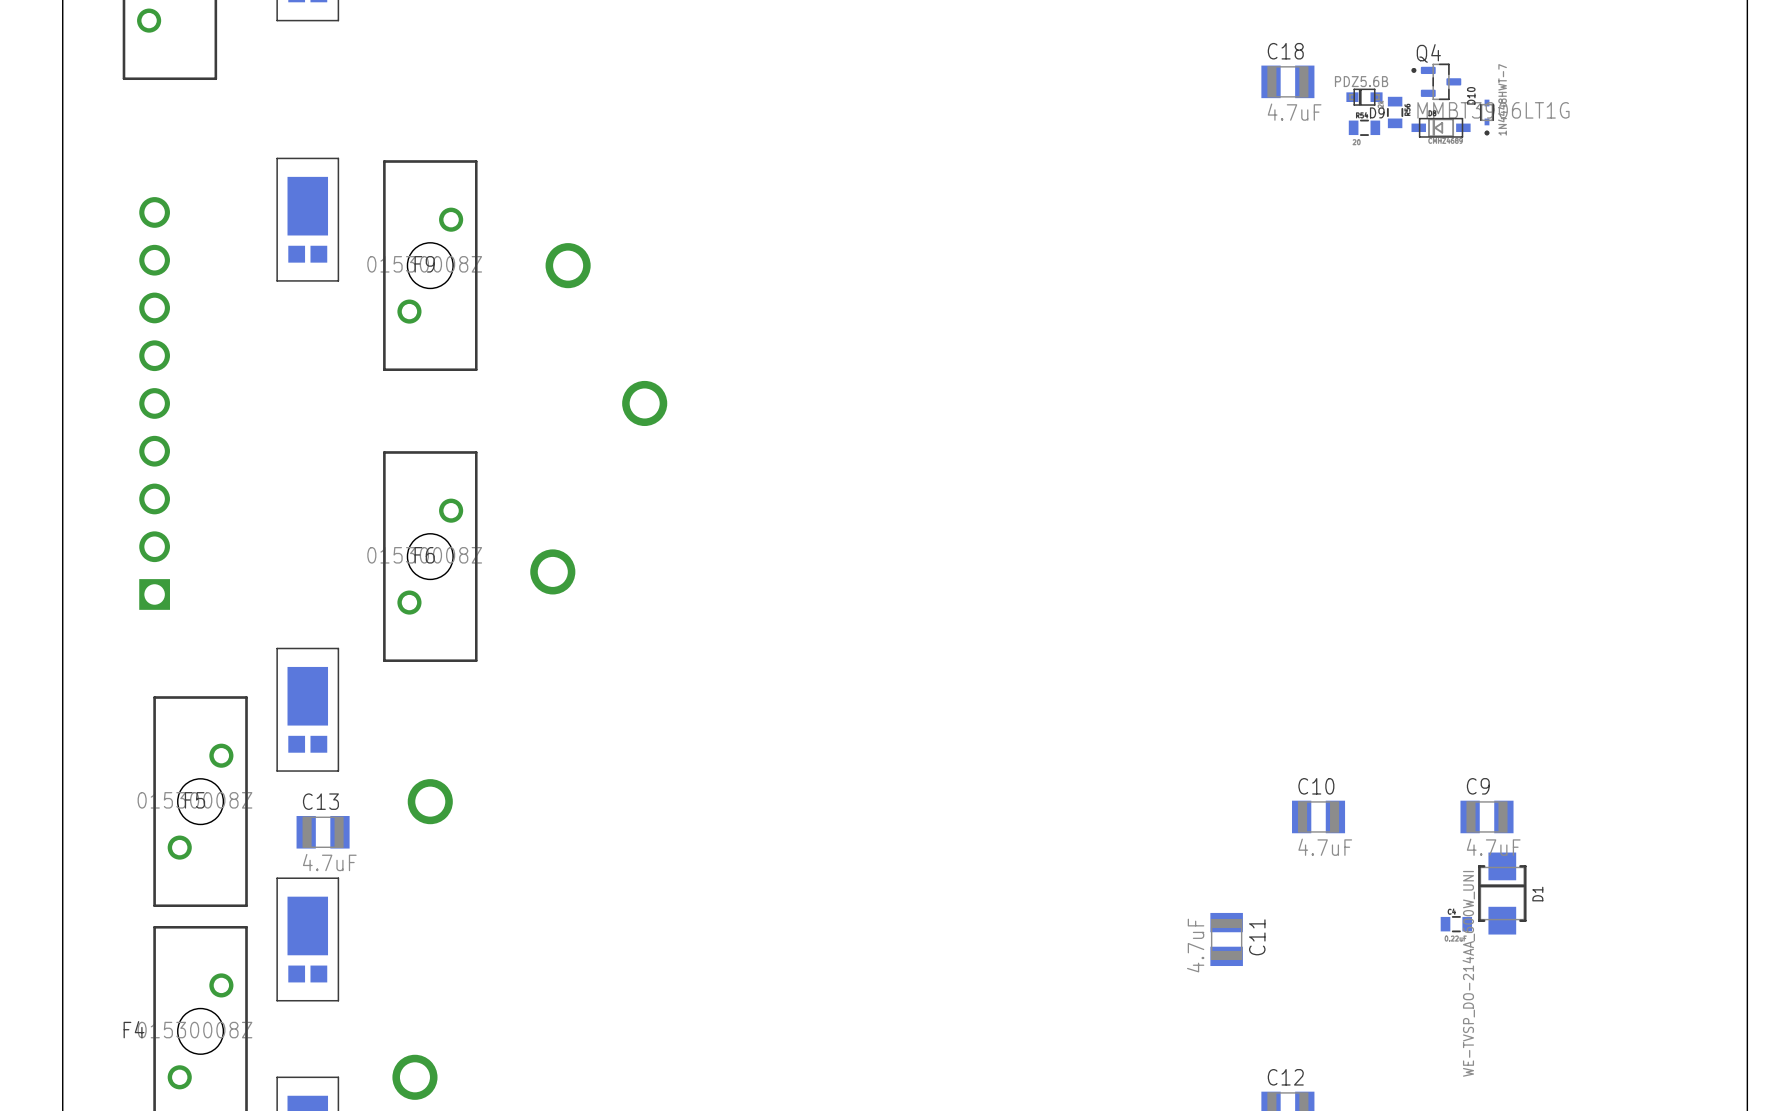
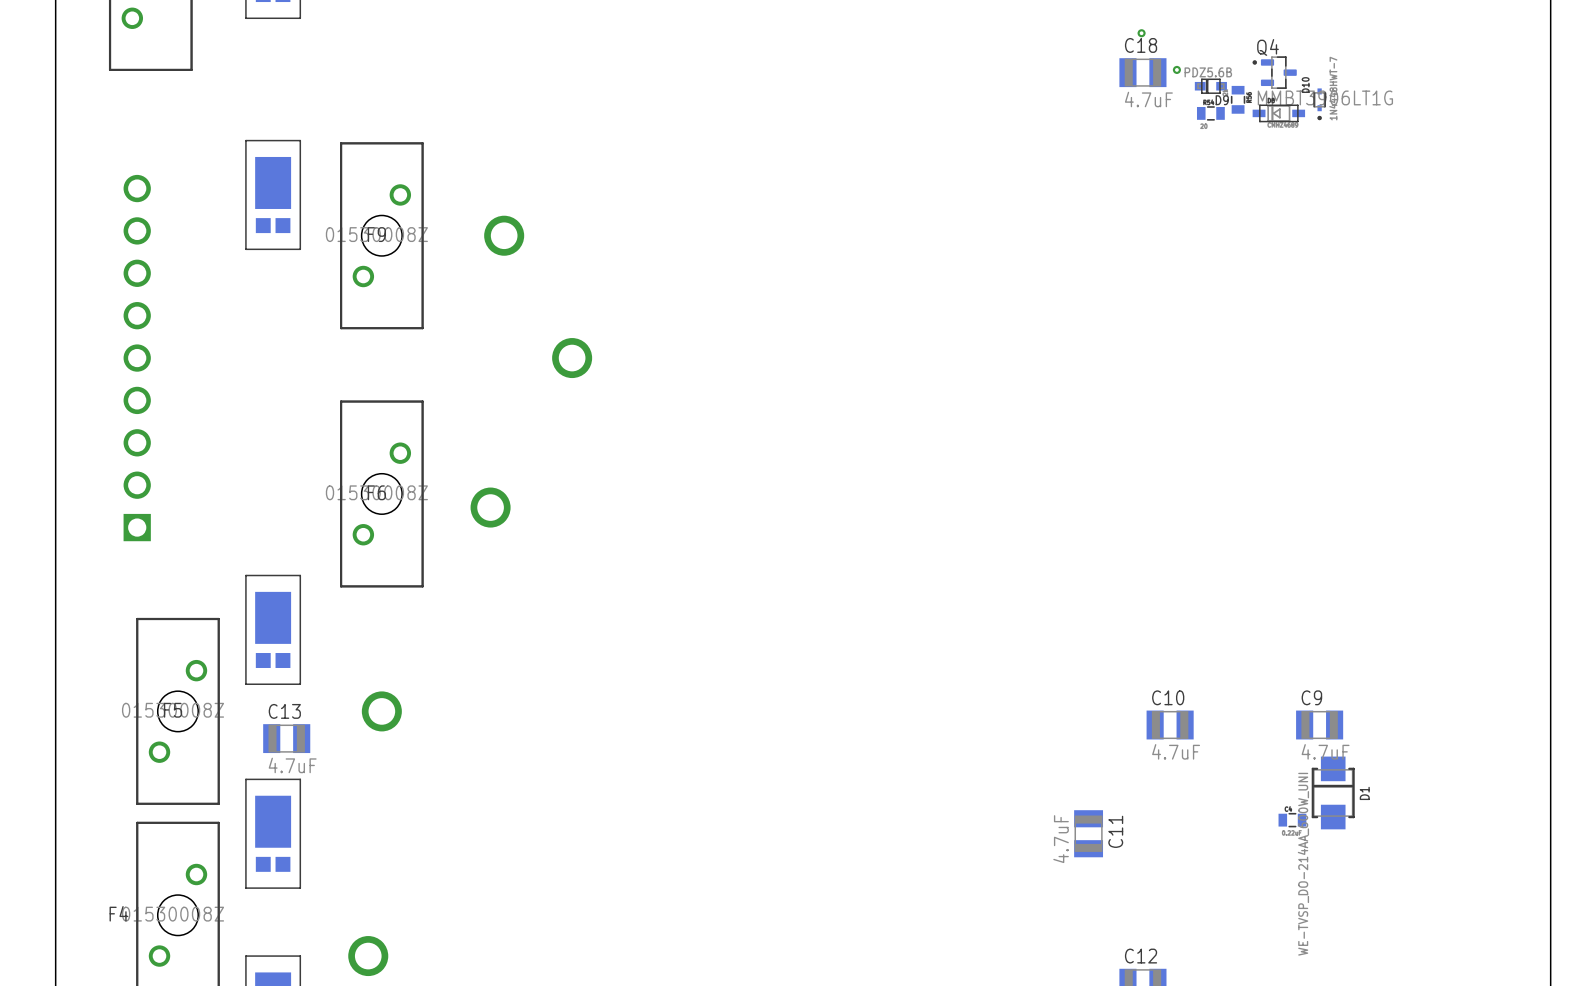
via: none -> (1141, 33)
via: none -> (1176, 69)

